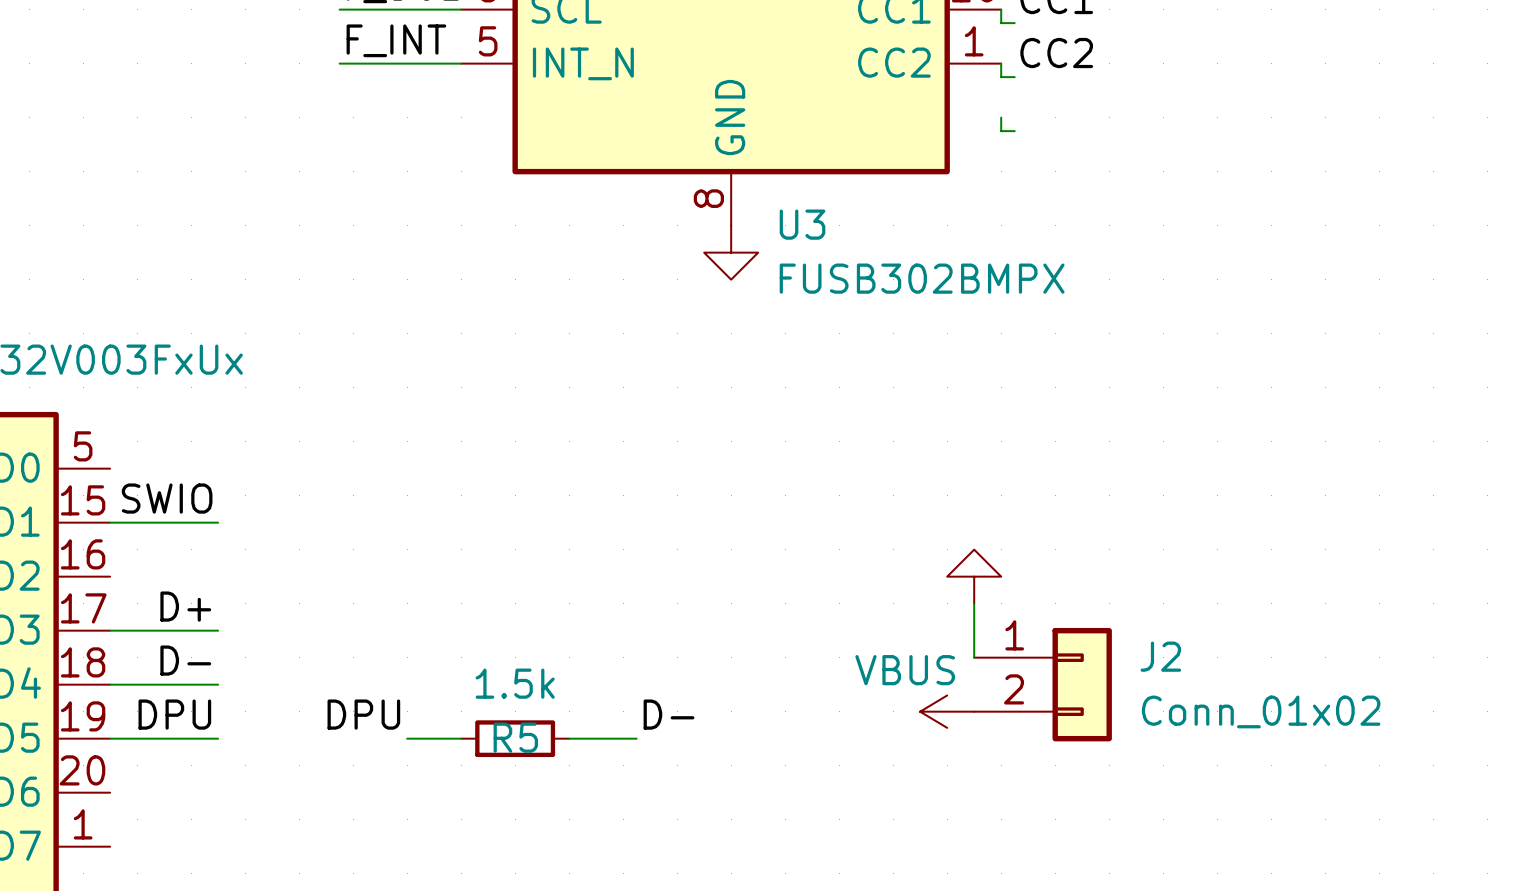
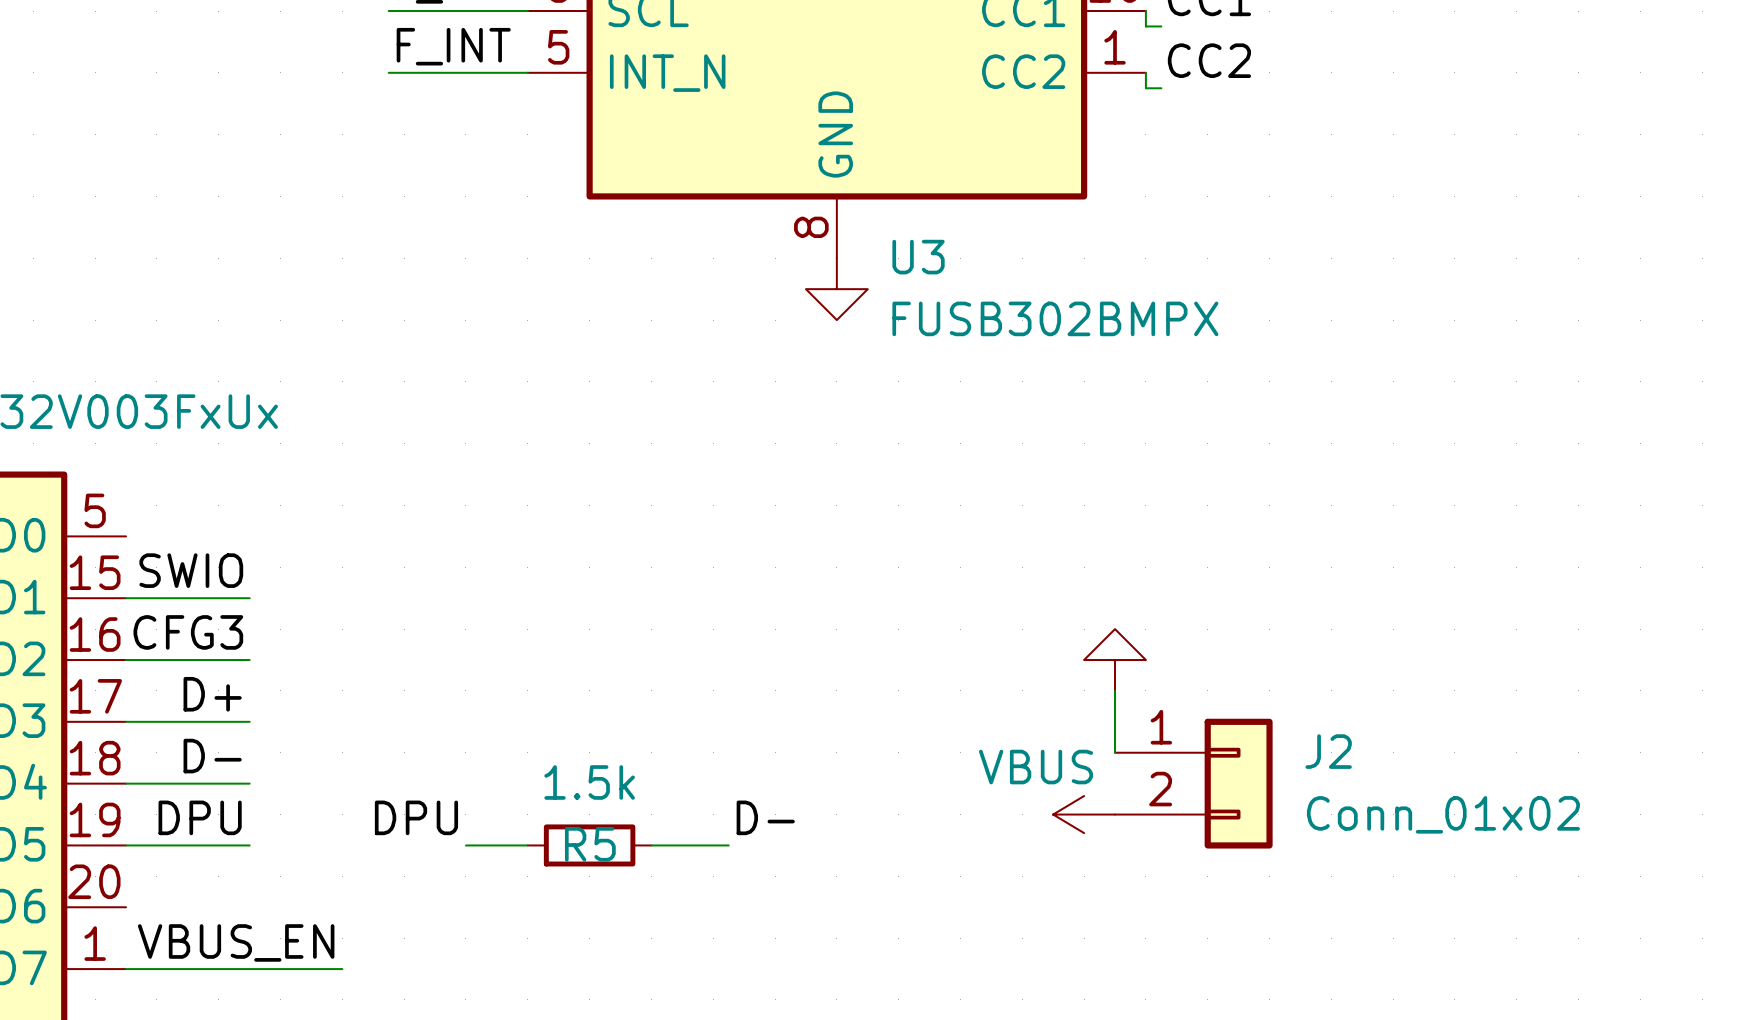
wire: (1001, 117) (1001, 131) (1014, 131) -> none
label: none -> CFG3 (188, 632)
wire: none -> (126, 660) (249, 660)
label: none -> VBUS_EN (236, 942)
wire: none -> (126, 969) (342, 969)

